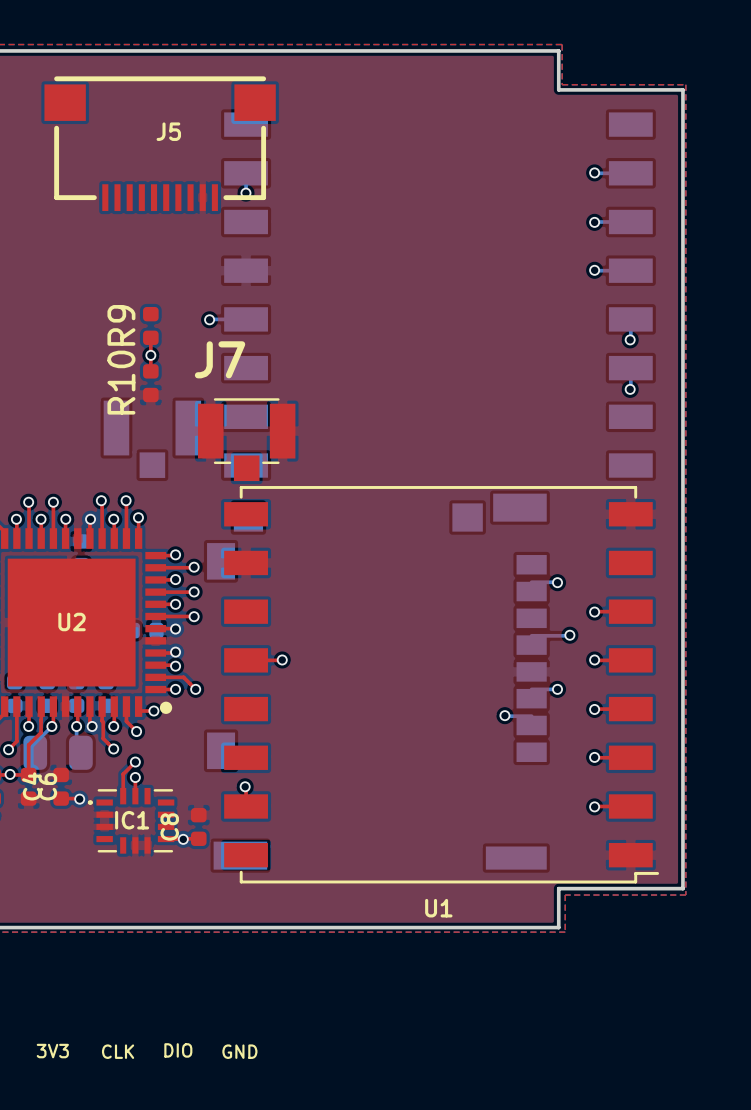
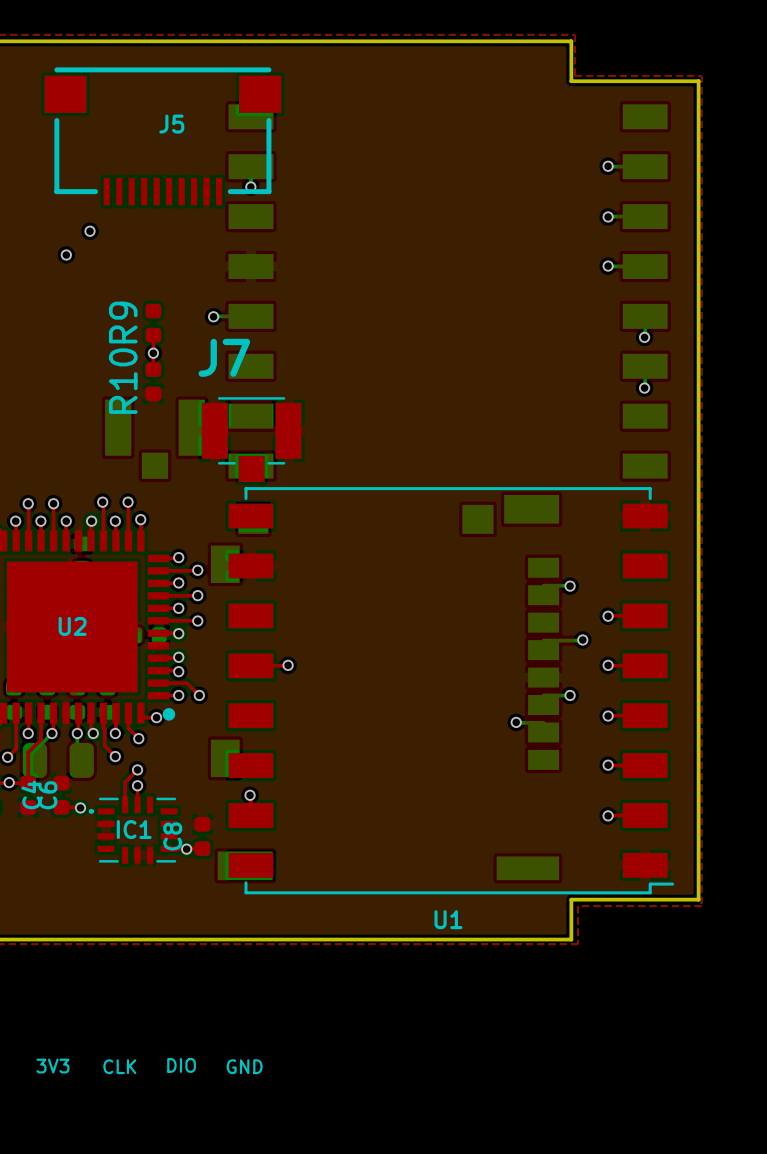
via: none -> (90, 231)
via: none -> (66, 254)

